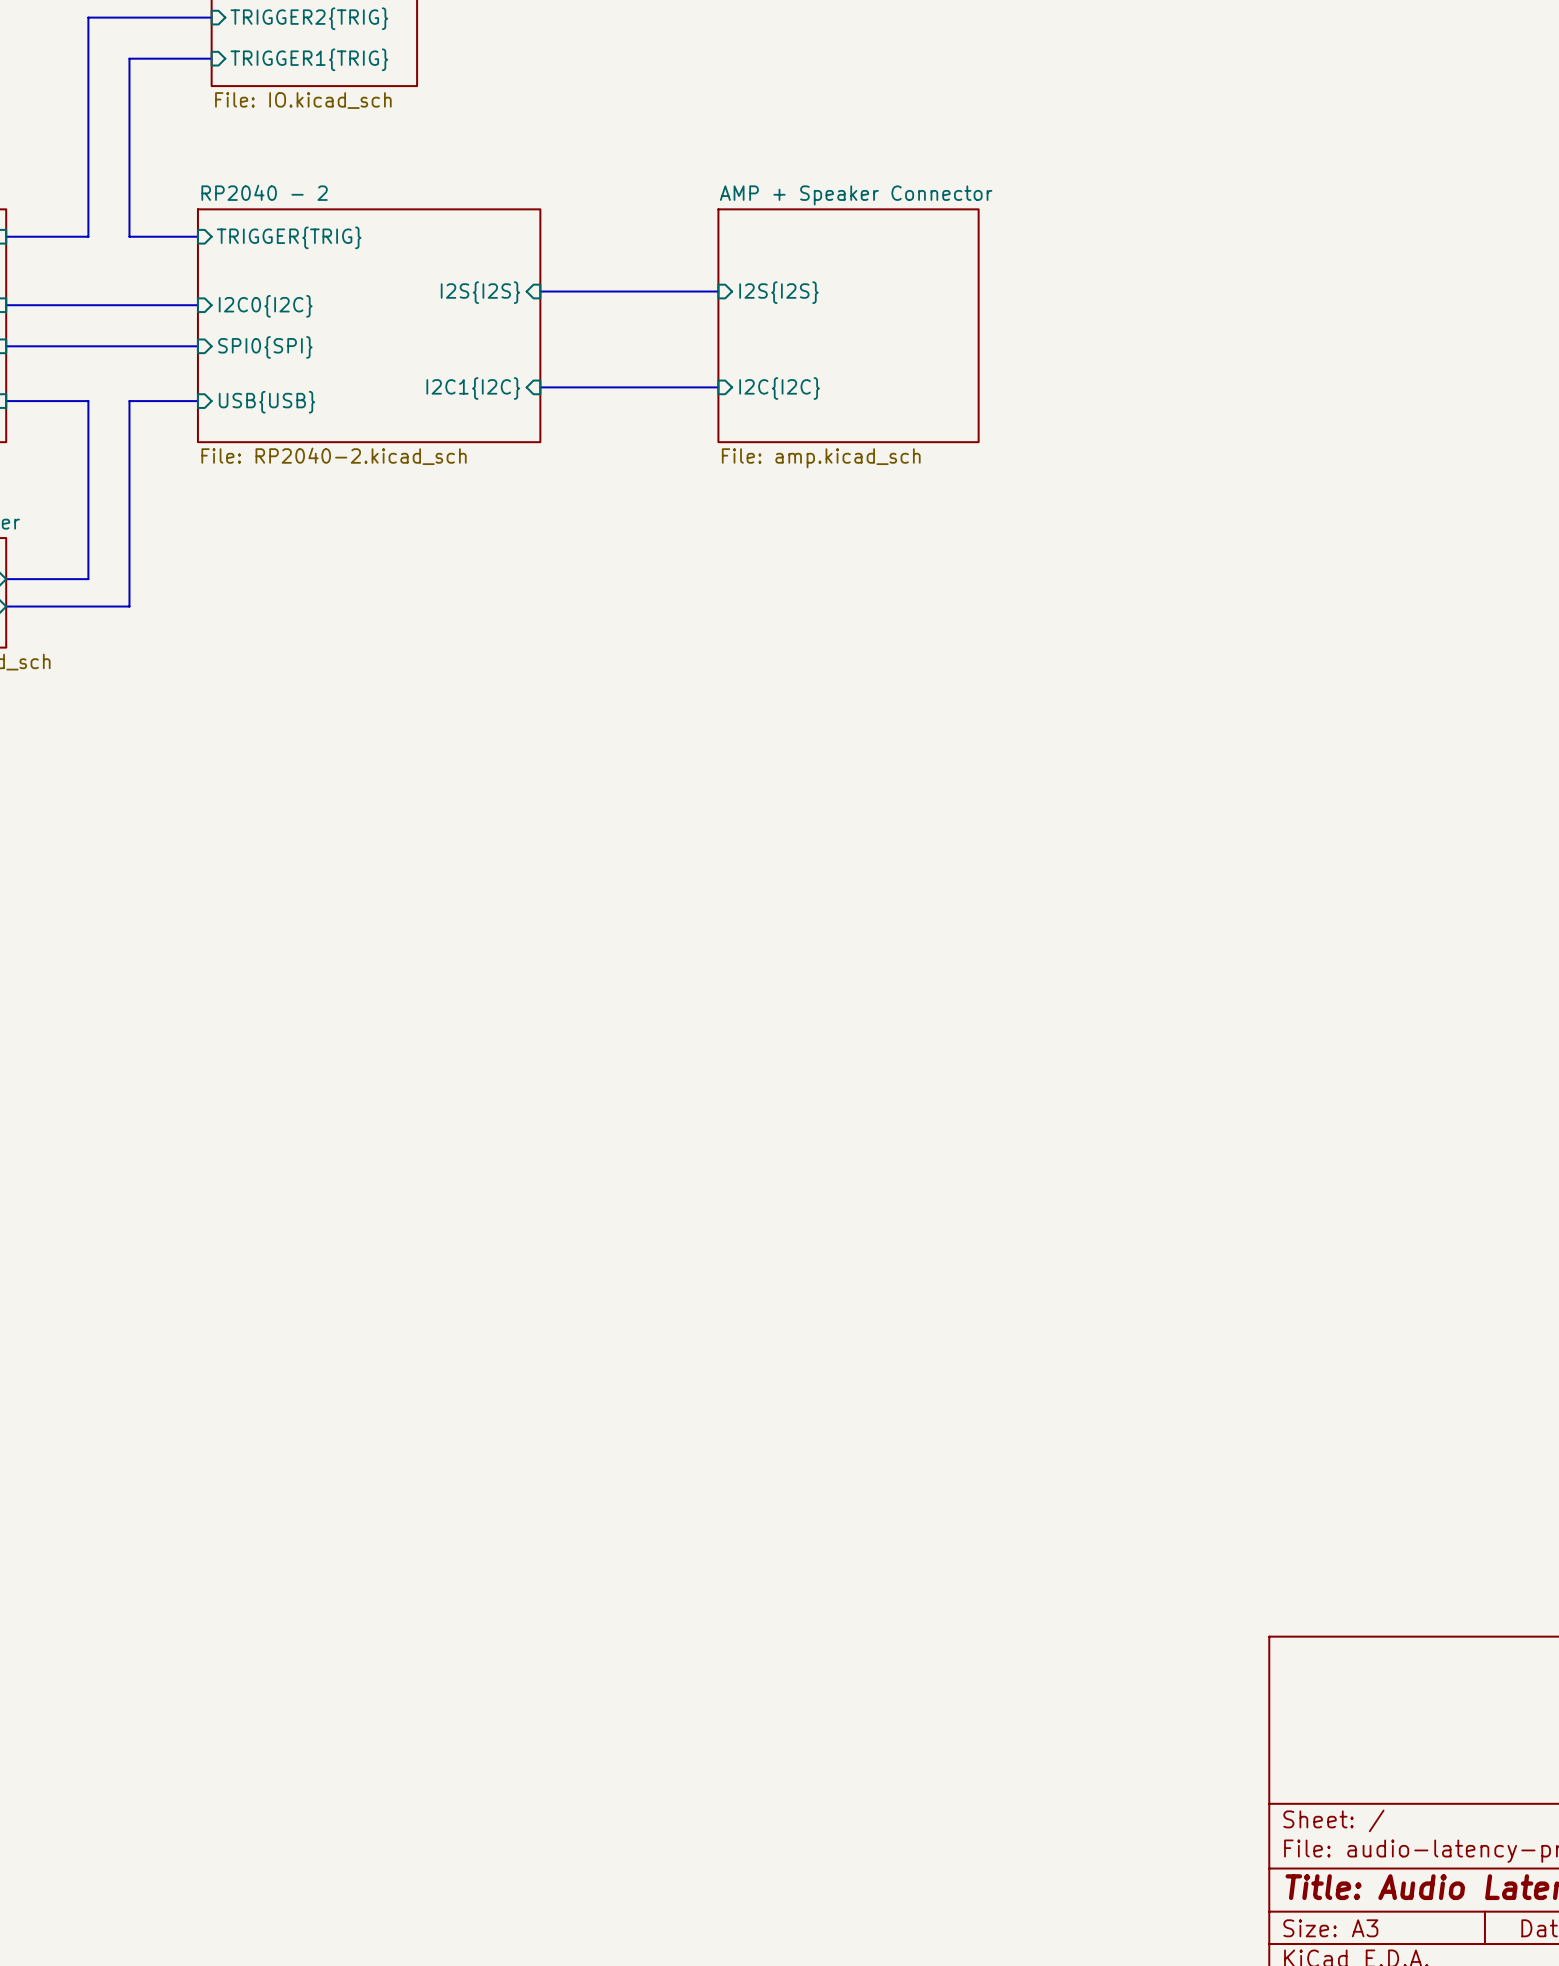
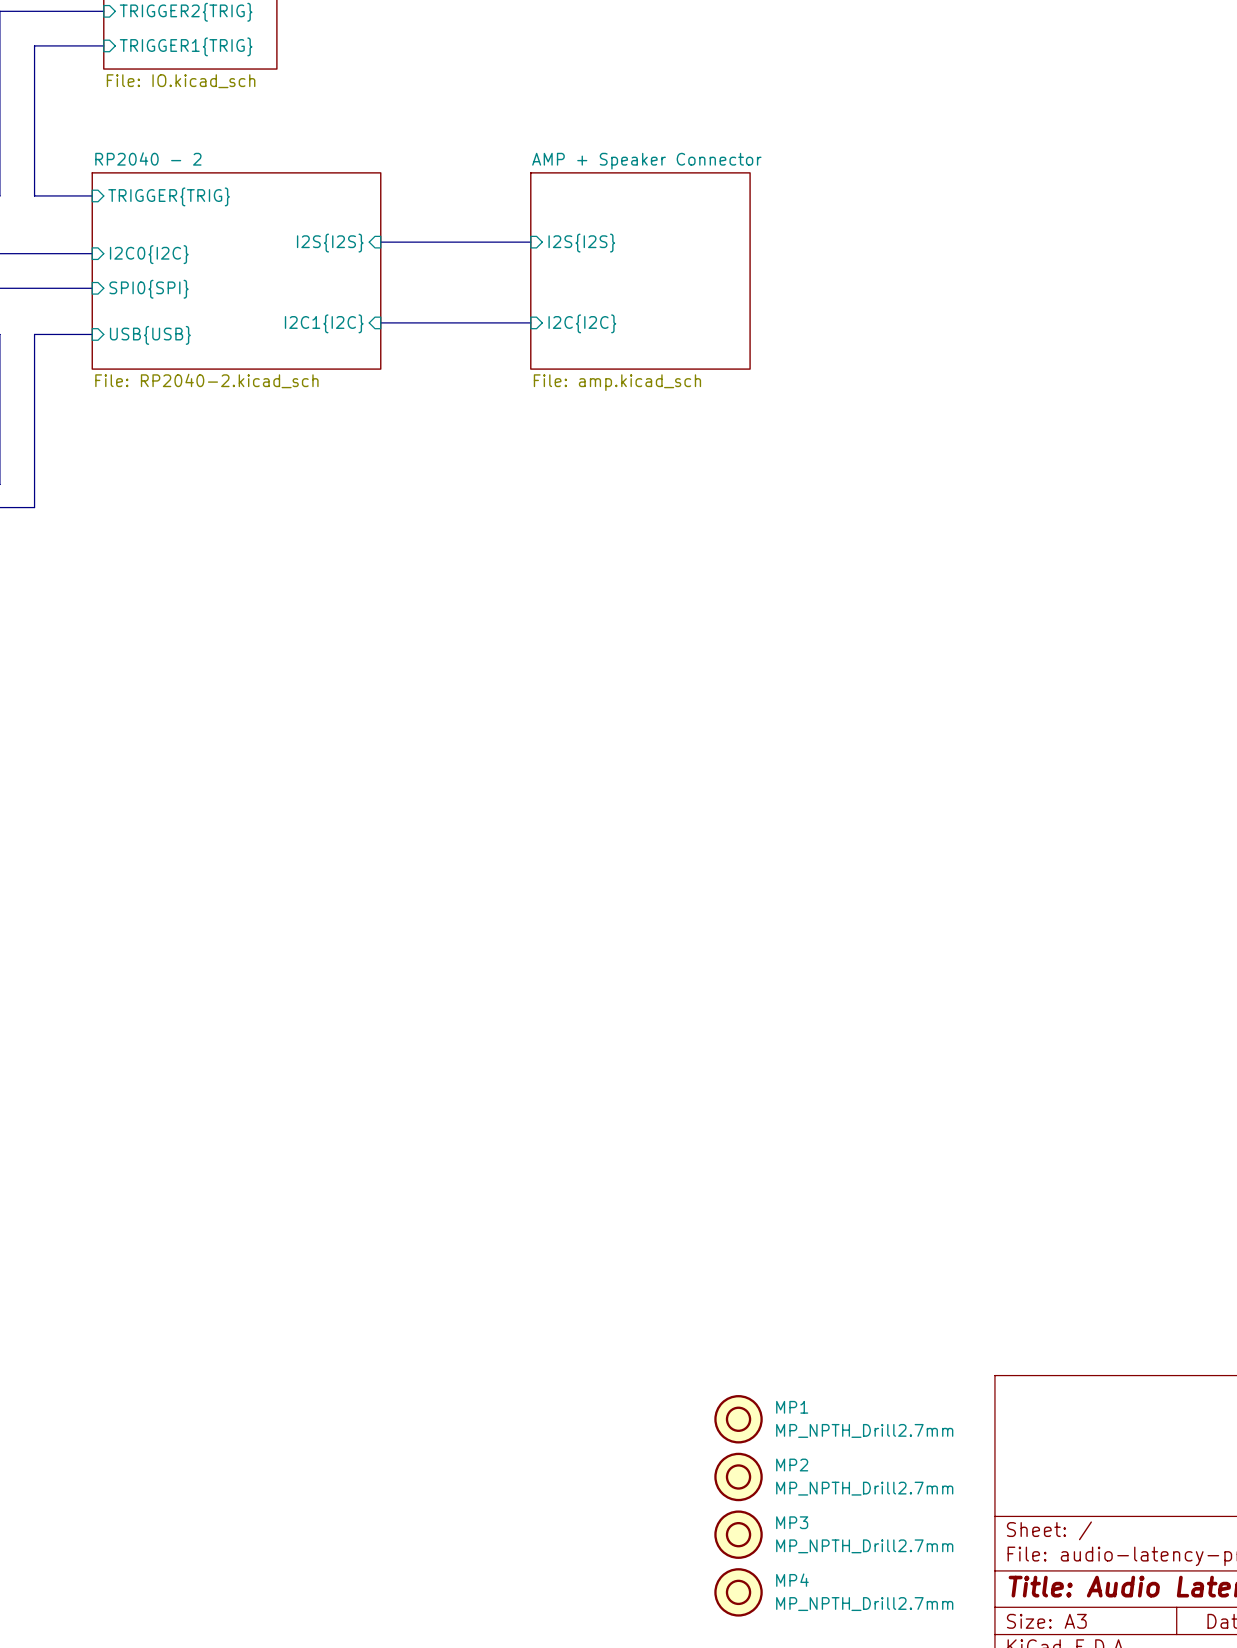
MP1: none -> MP_NPTH_Drill2.7mm (738, 1419)
MP2: none -> MP_NPTH_Drill2.7mm (738, 1476)
MP3: none -> MP_NPTH_Drill2.7mm (738, 1534)
MP4: none -> MP_NPTH_Drill2.7mm (738, 1592)

